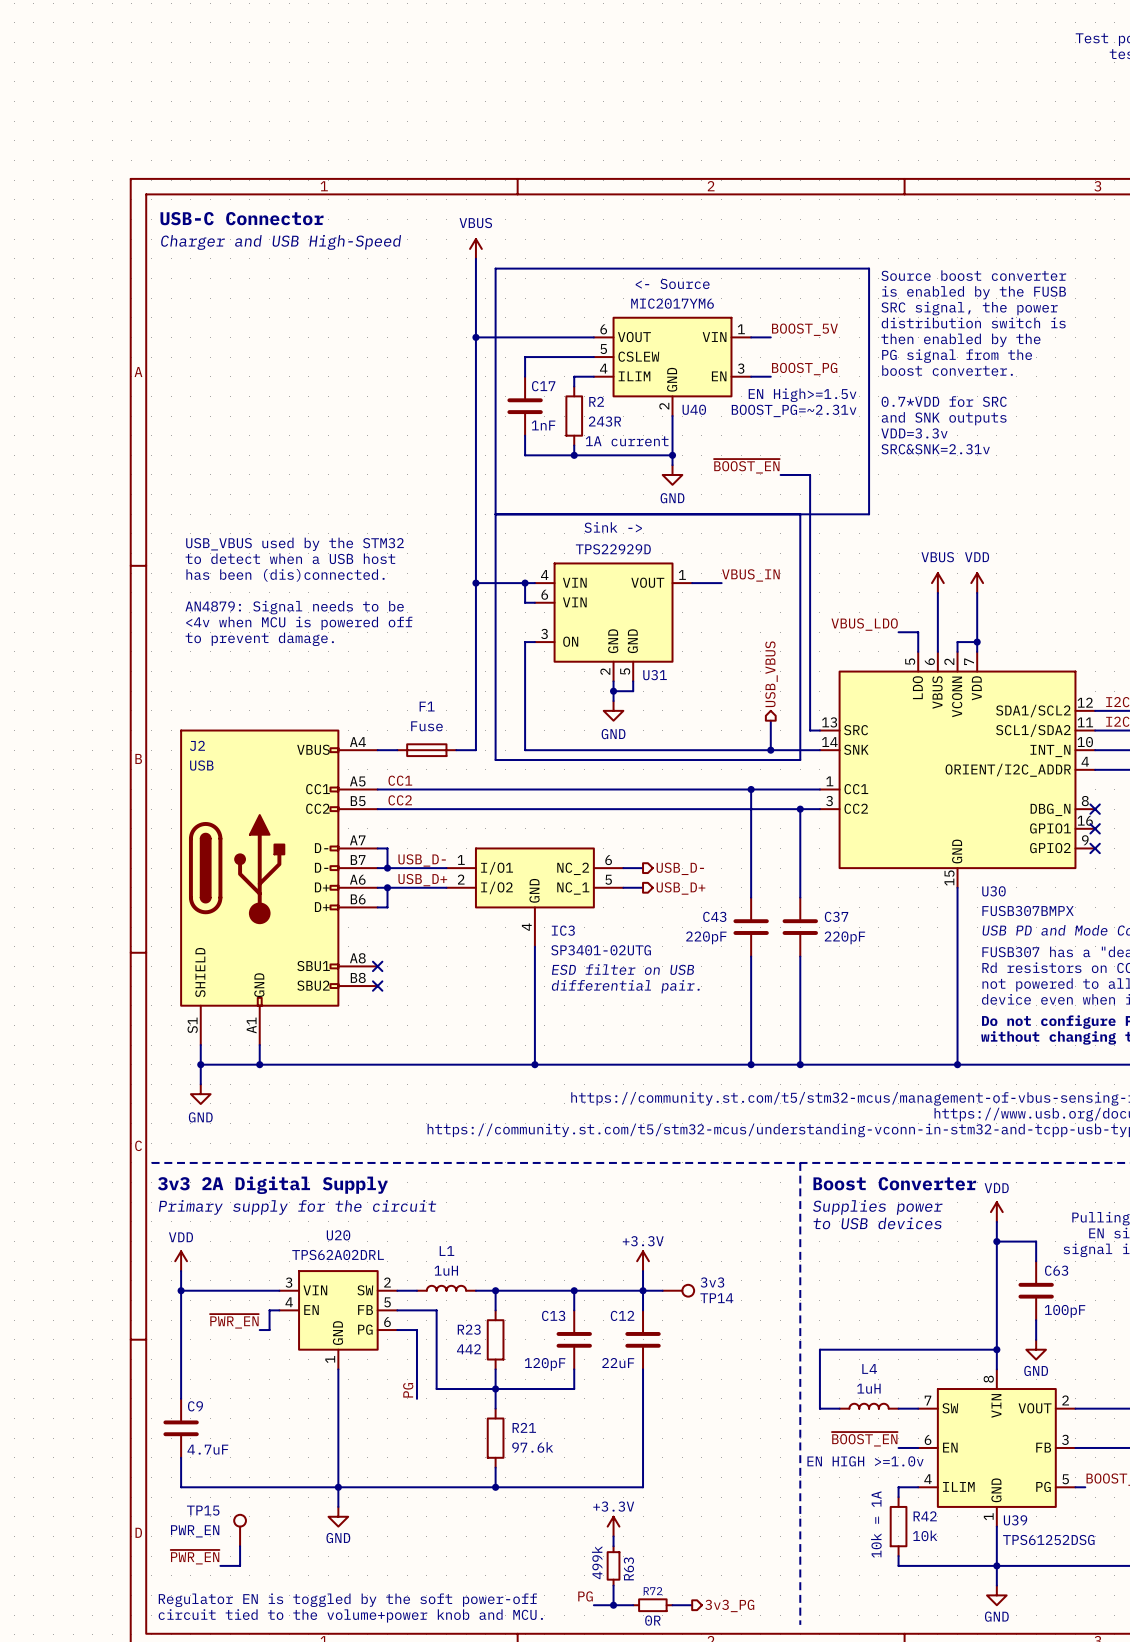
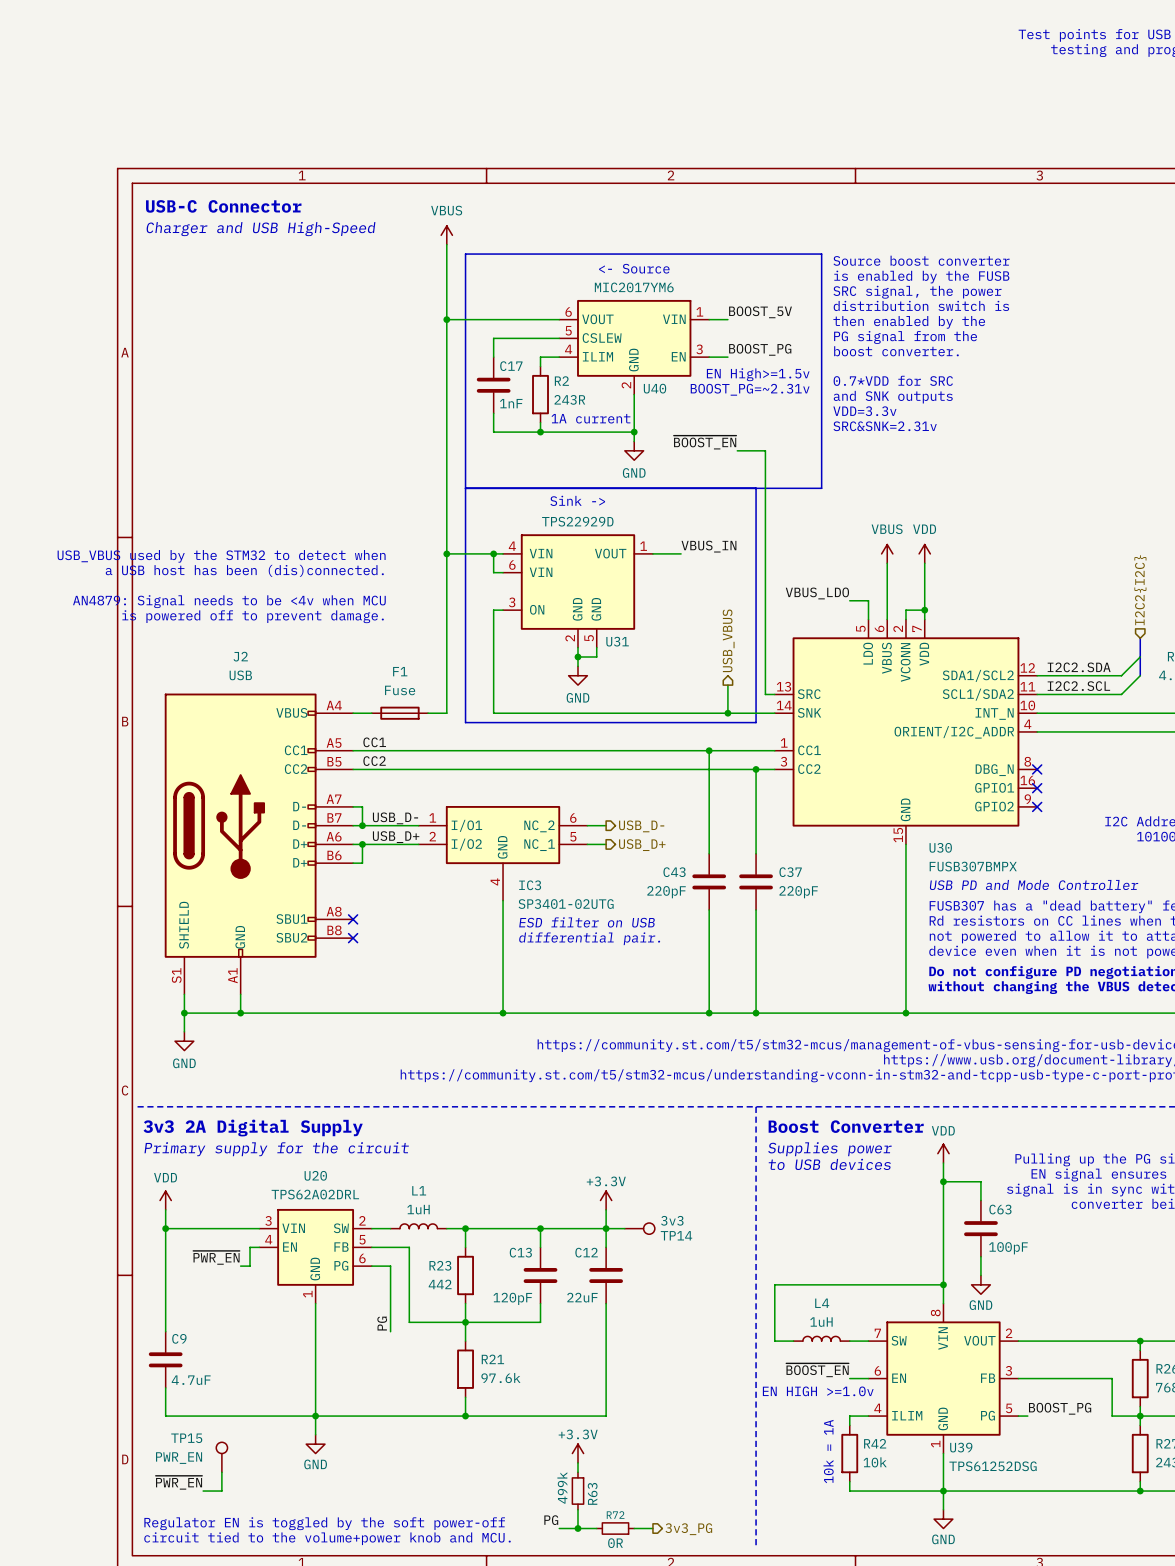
text: USB_VBUS used by the STM32 (294, 544) -> none
text: to detect when a USB host (290, 558) -> none
text: has been (dis)connected. (285, 575) -> none
text: none -> USB_VBUS used by the STM32 to detect when (221, 556)
text: none -> a USB host has been (dis)connected. (244, 570)
text: AN4879: Signal needs to be (294, 607) -> none
text: <4v when MCU is powered off (299, 623) -> none
text: none -> AN4879: Signal needs to be <4v when MCU (229, 601)
text: to prevent damage. (259, 639) -> none
text: none -> is powered off to prevent damage. (253, 616)
J2 name position: J2 (197, 745) -> J2 (240, 656)
J2 value position: USB (201, 765) -> USB (240, 675)

